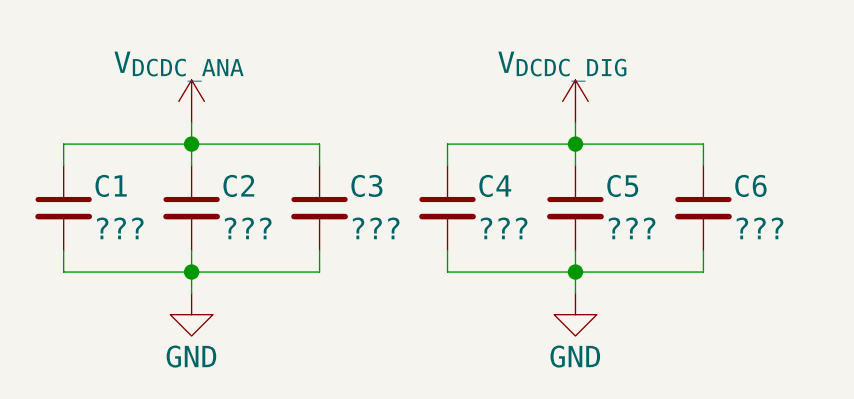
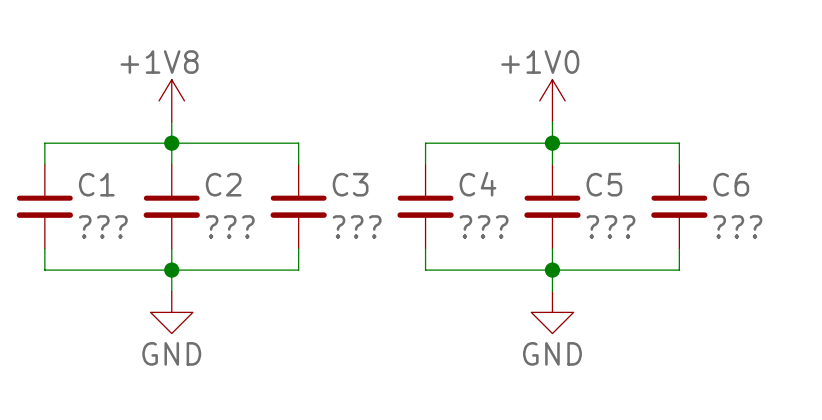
power symbol: VDCDC_ANA (191, 101) -> +1V8 (171, 100)
power symbol: VDCDC_DIG (575, 101) -> +1V0 (552, 100)

